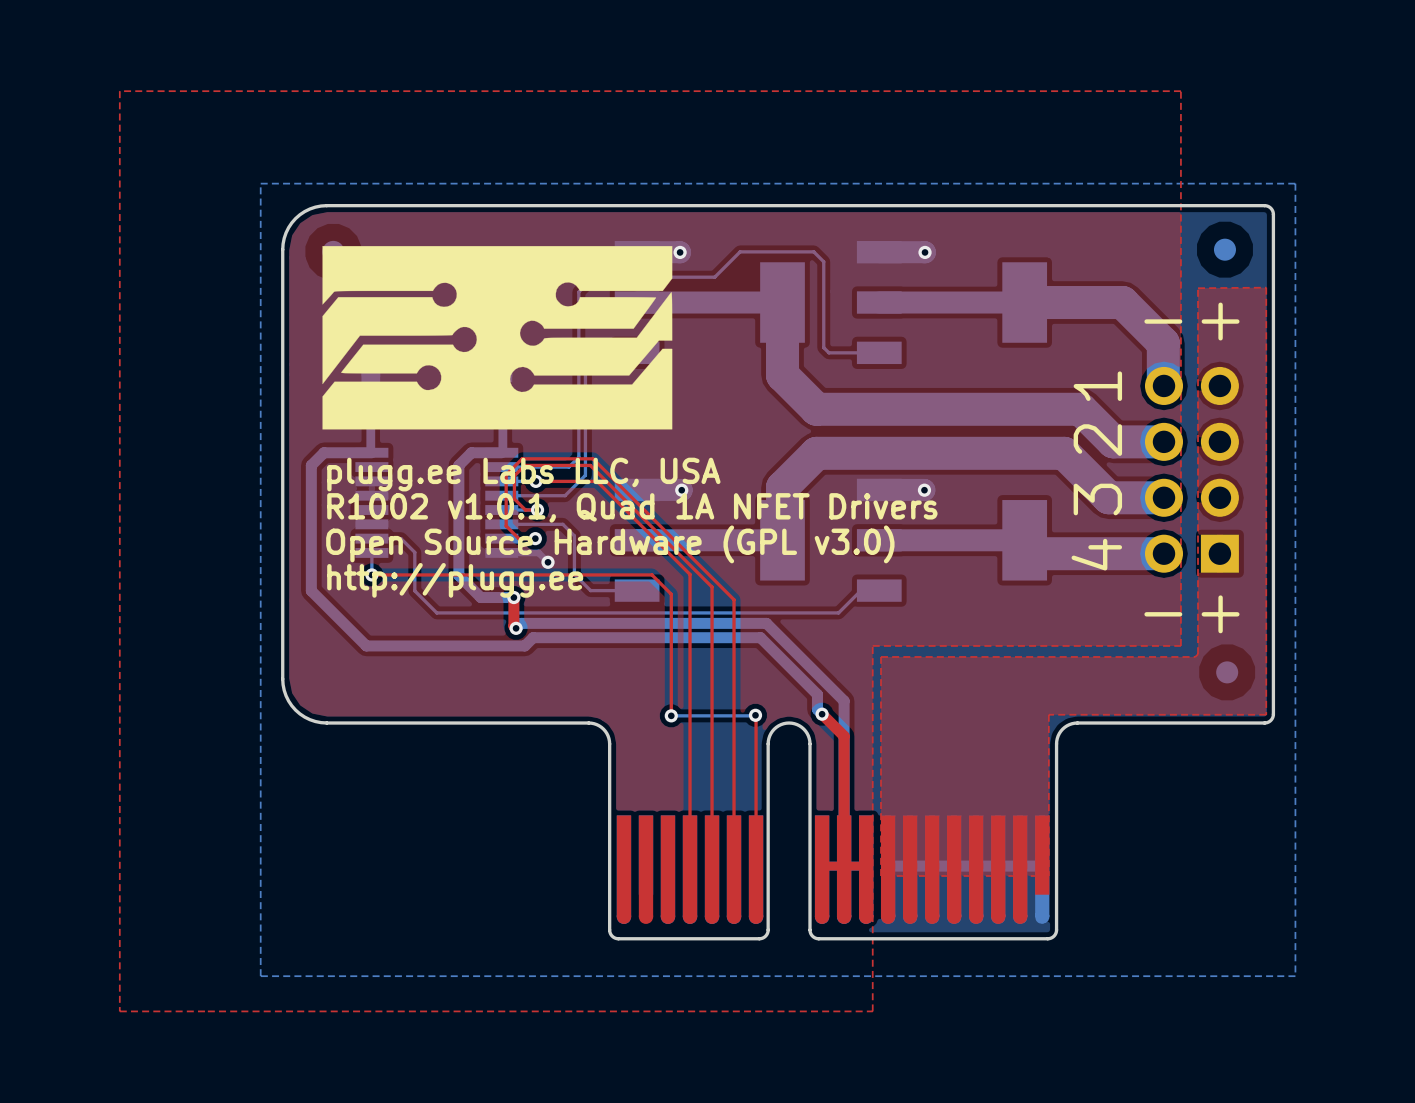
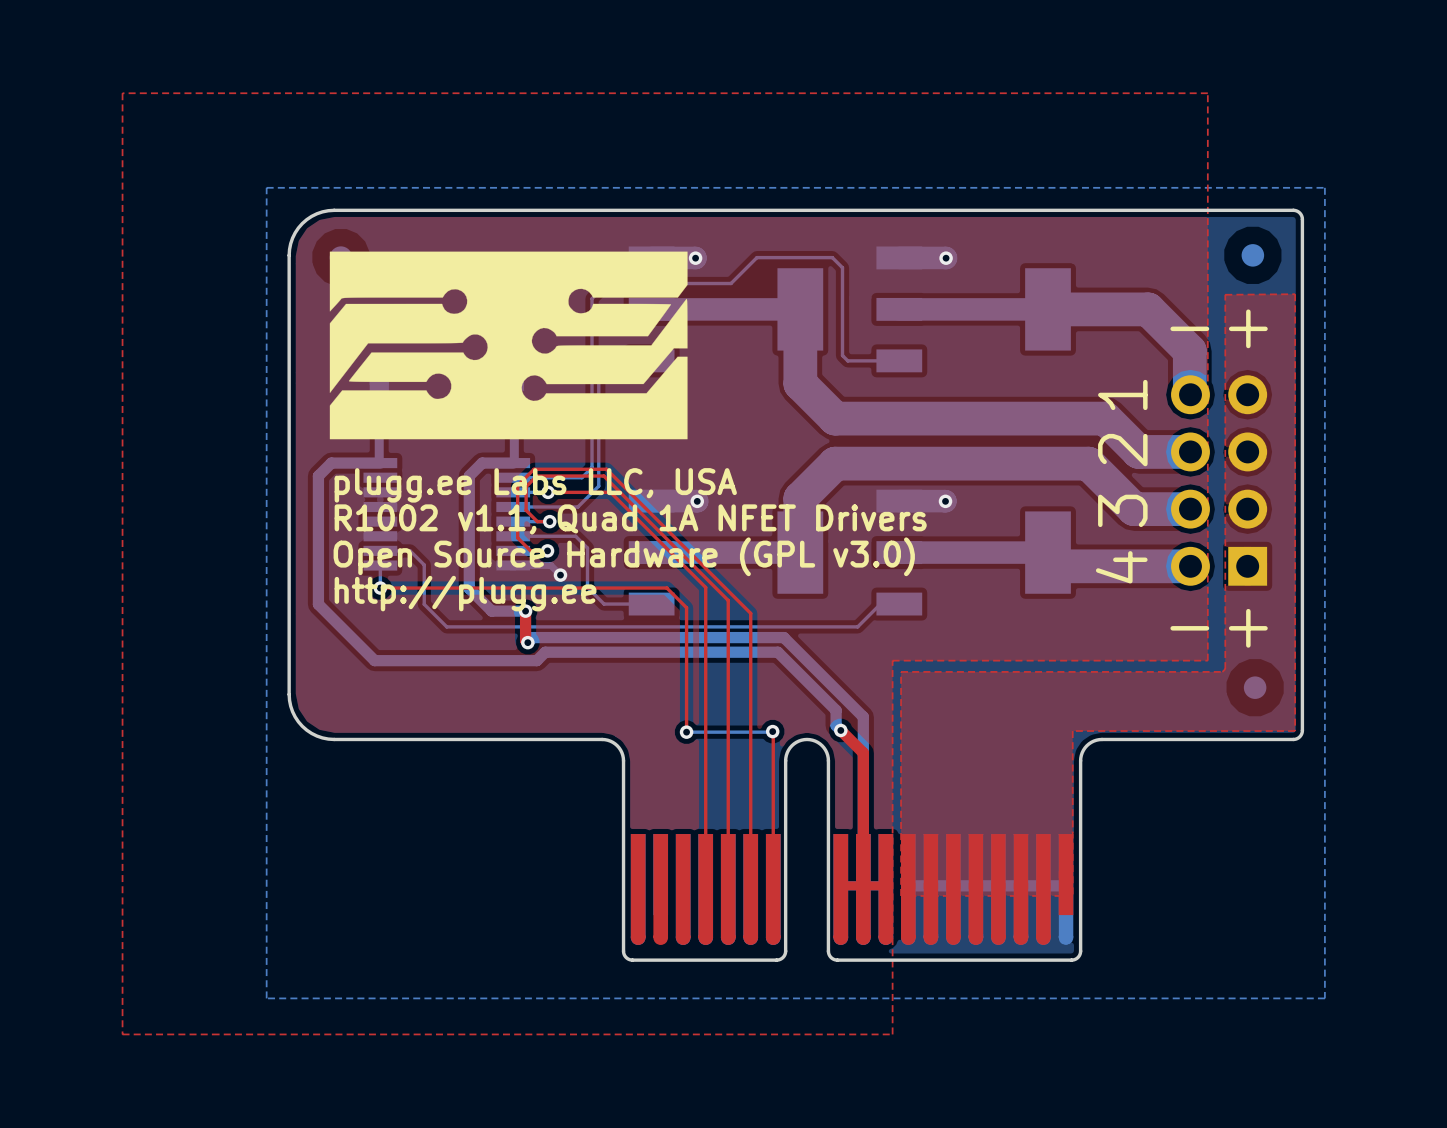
text: R1002 v1.0.1, Quad 1A NFET Drivers (632, 507) -> R1002 v1.1, Quad 1A NFET Drivers (630, 519)

